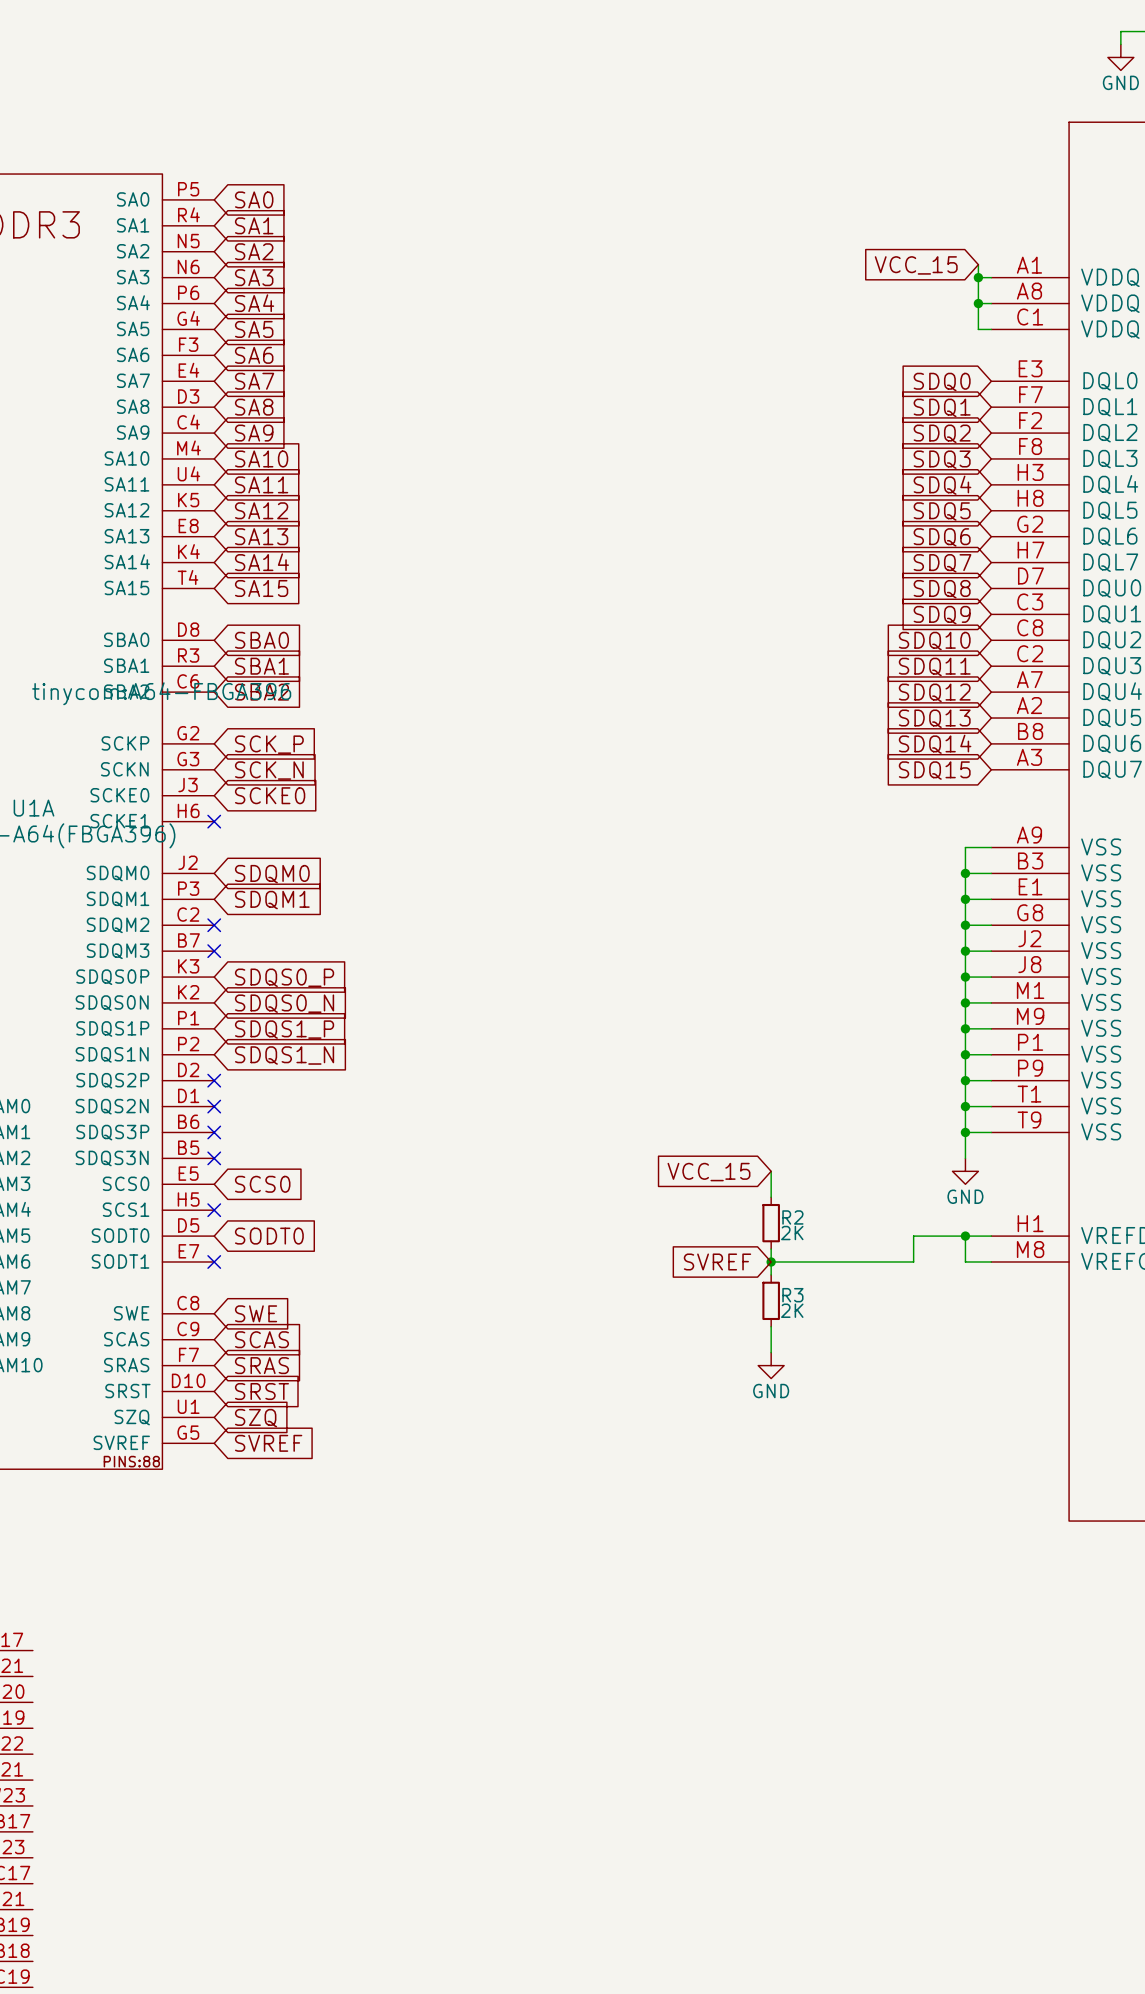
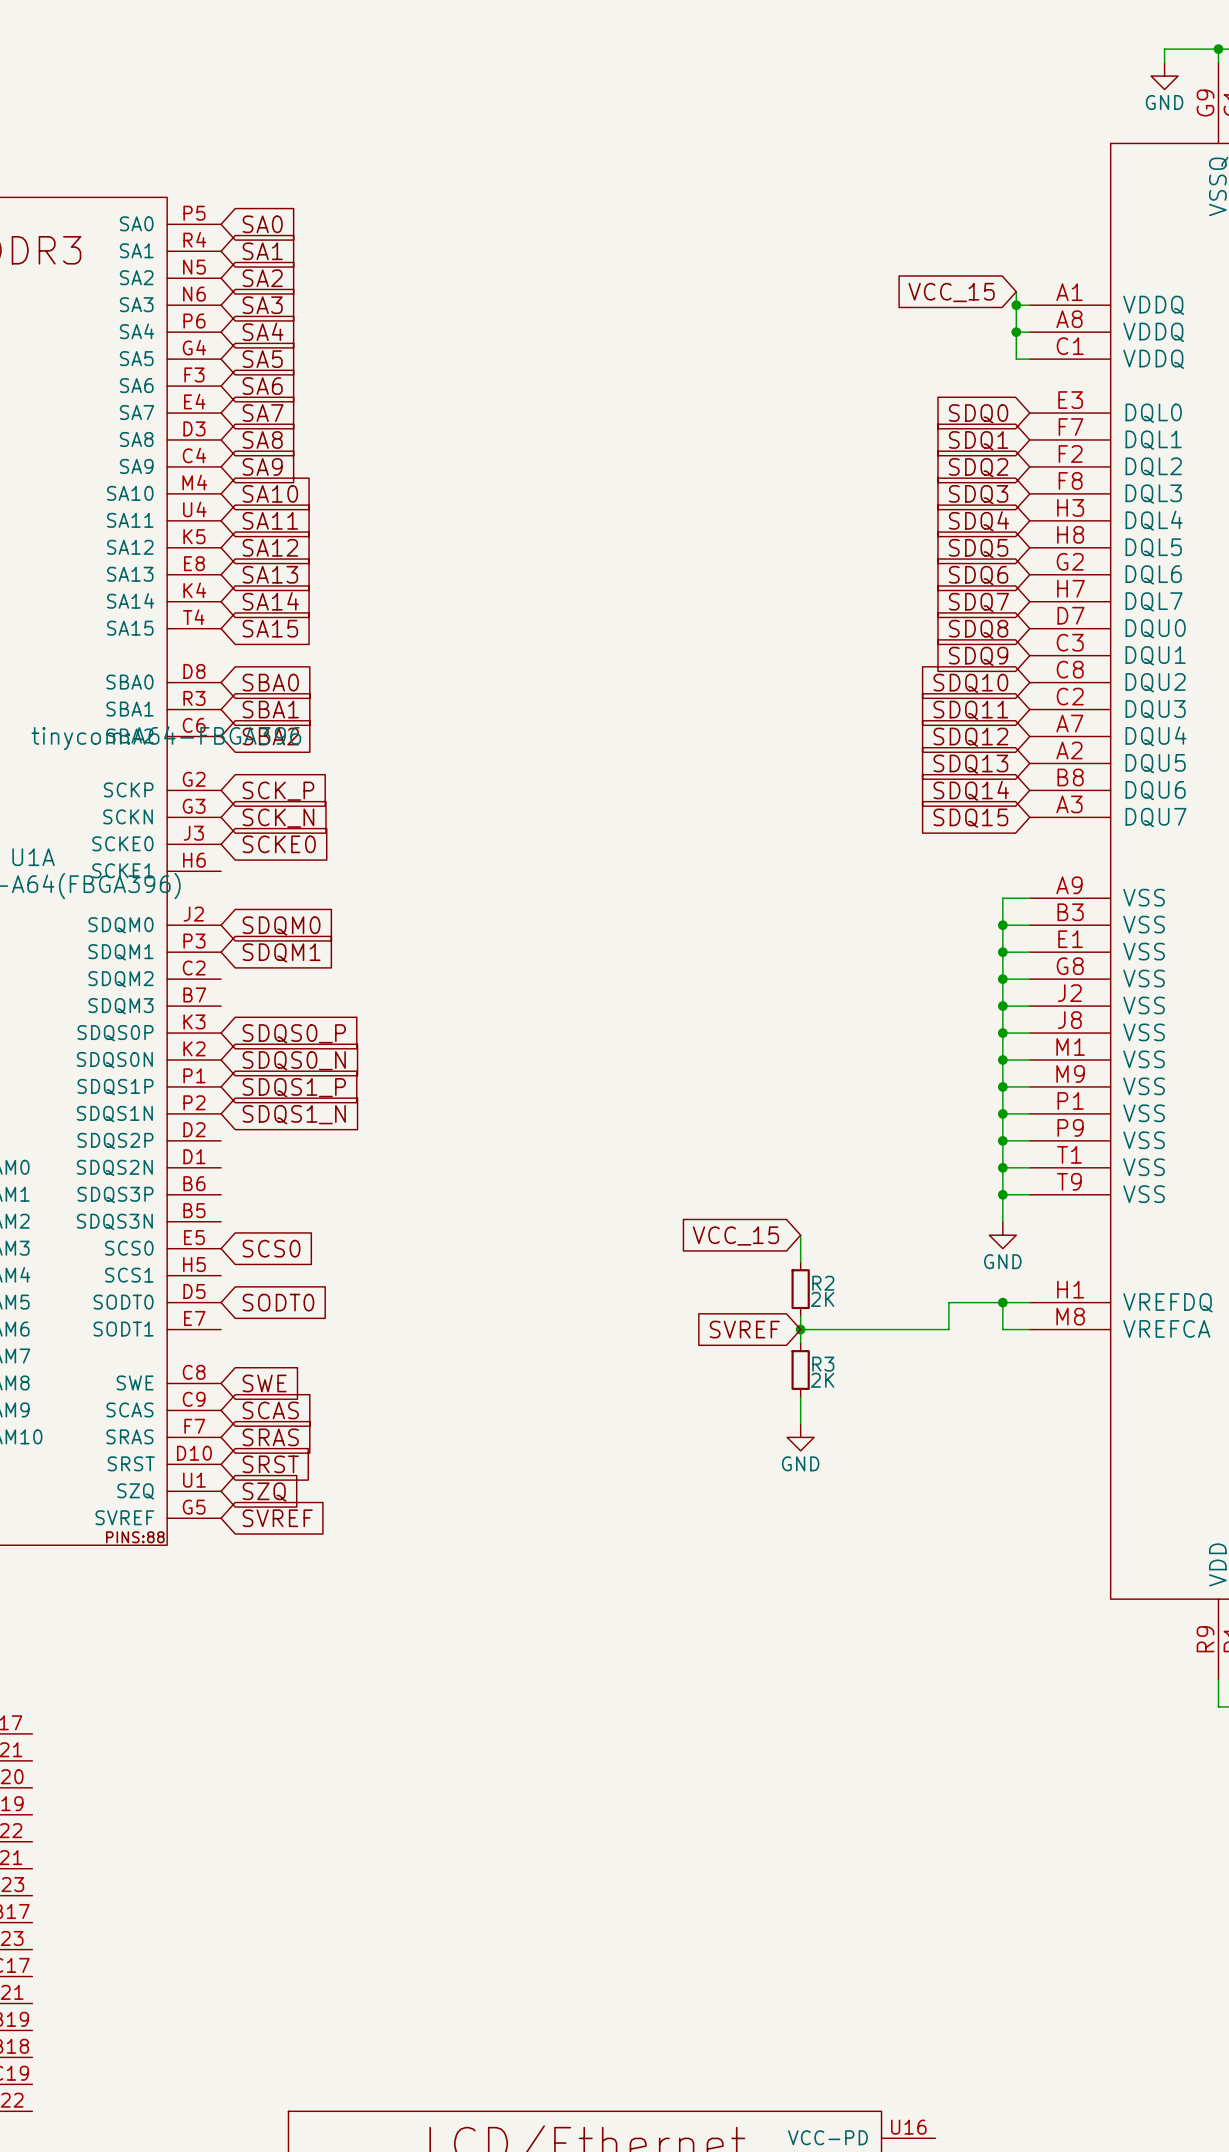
no-connect mark: (214, 821) -> none
no-connect mark: (214, 925) -> none
no-connect mark: (214, 951) -> none
no-connect mark: (214, 1080) -> none
no-connect mark: (214, 1106) -> none
no-connect mark: (214, 1132) -> none
no-connect mark: (214, 1158) -> none
no-connect mark: (214, 1210) -> none
no-connect mark: (214, 1261) -> none

